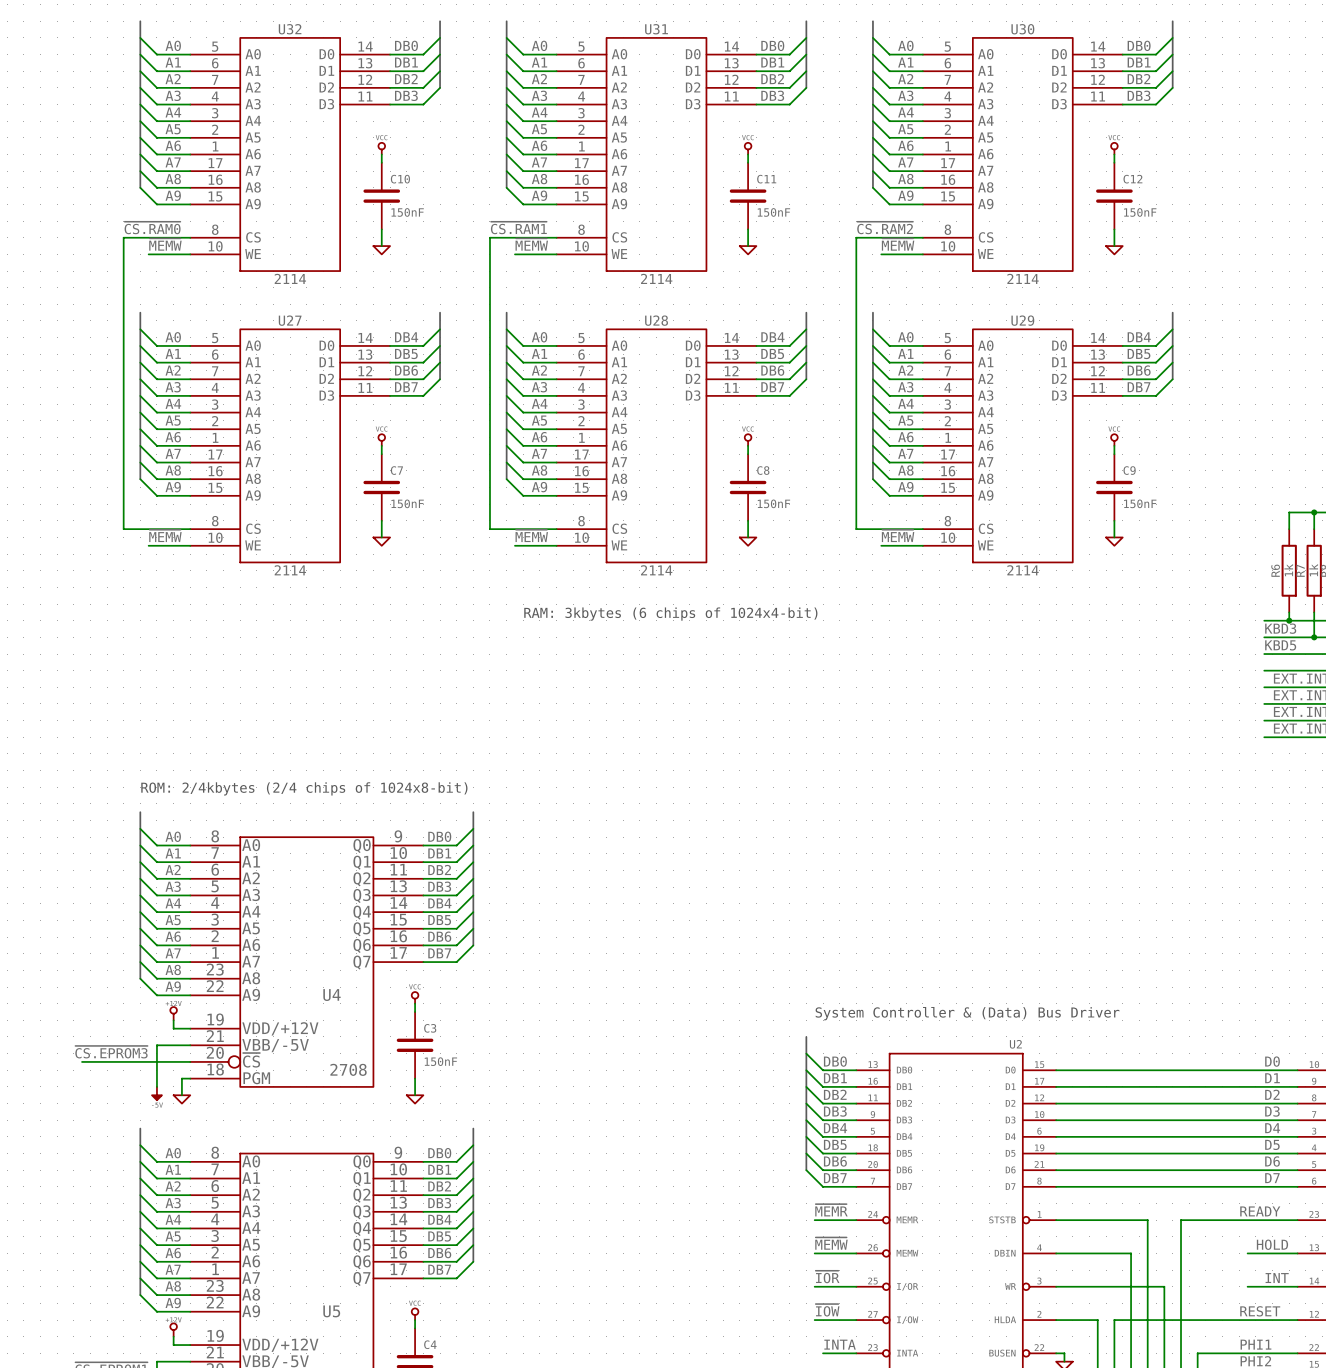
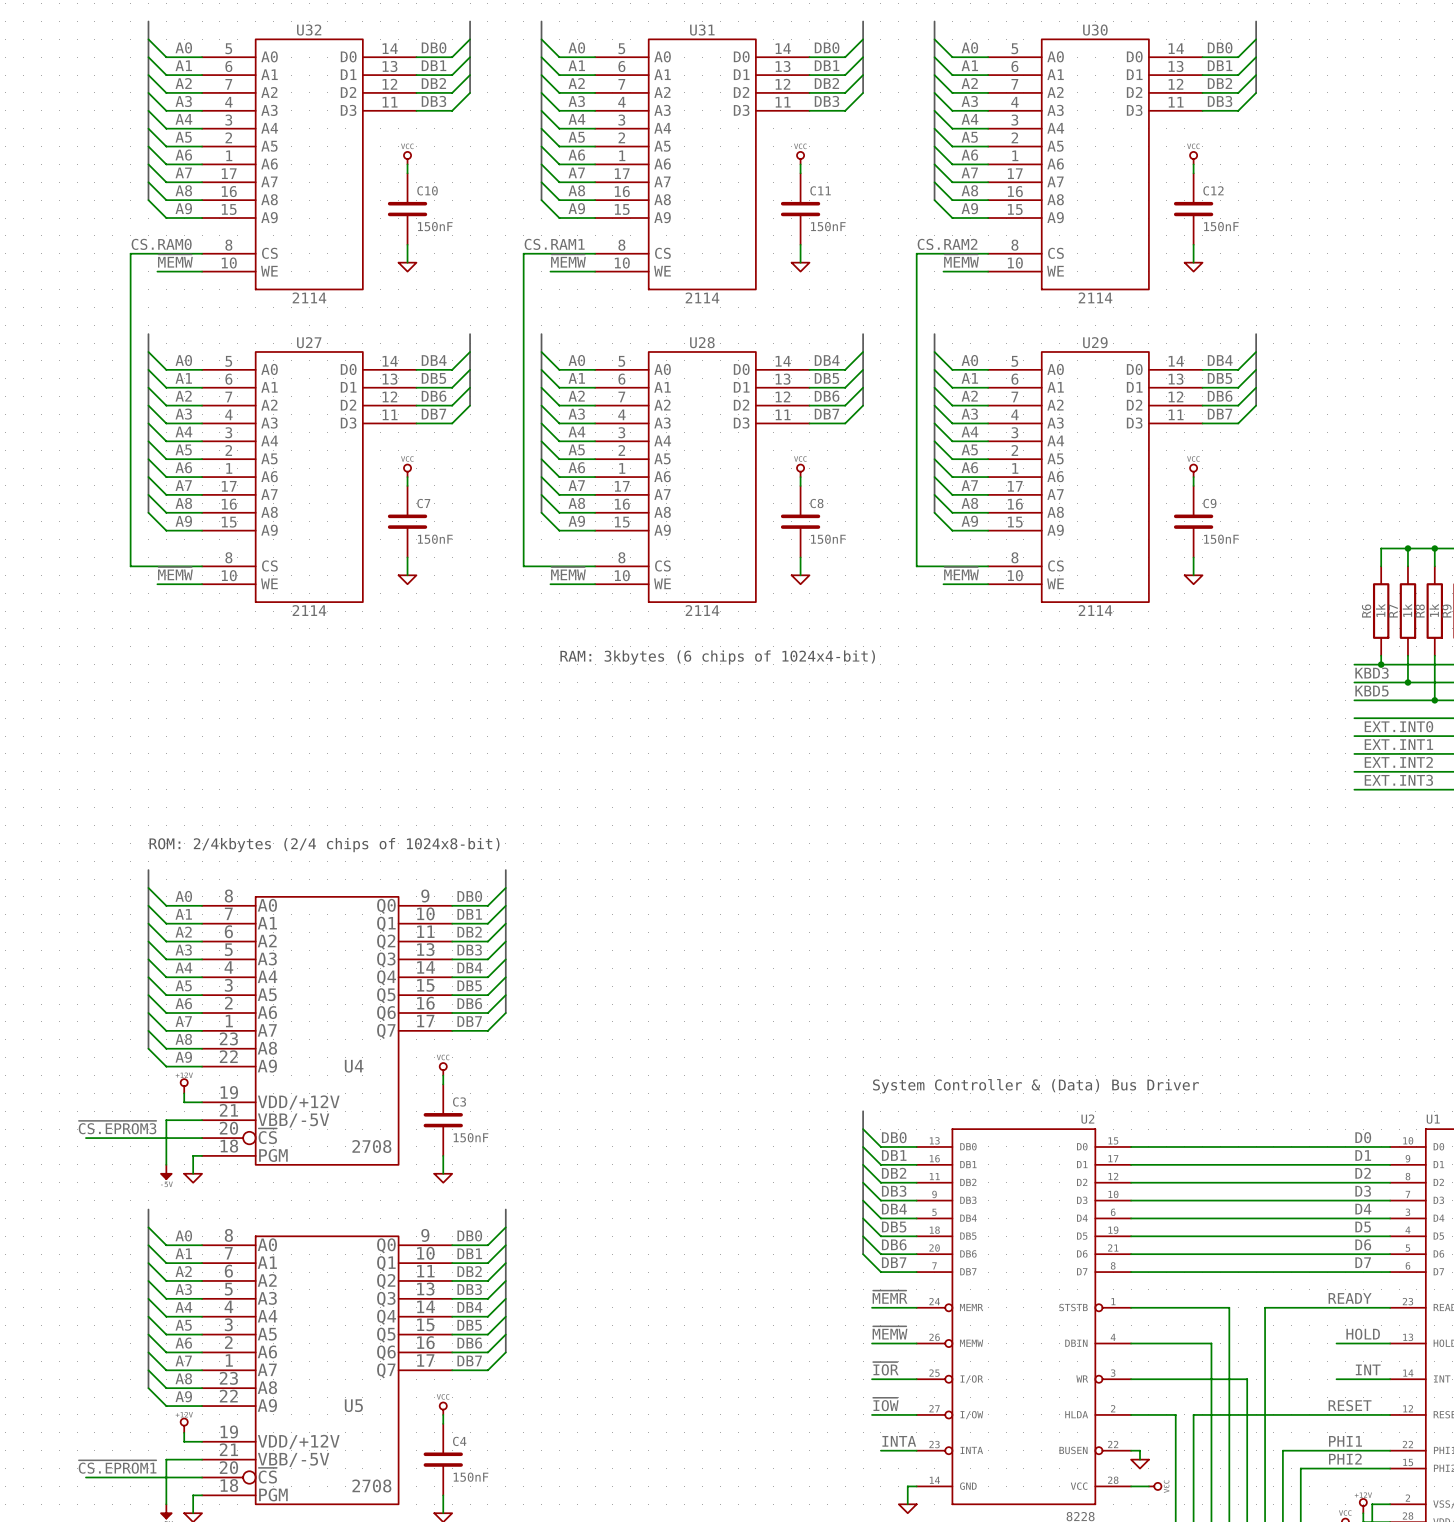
label: ~{CS.RAM0} (152, 227) -> CS.RAM0 (161, 244)
label: ~{CS.RAM1} (518, 227) -> CS.RAM1 (554, 244)
label: ~{CS.RAM2} (885, 227) -> CS.RAM2 (947, 244)

